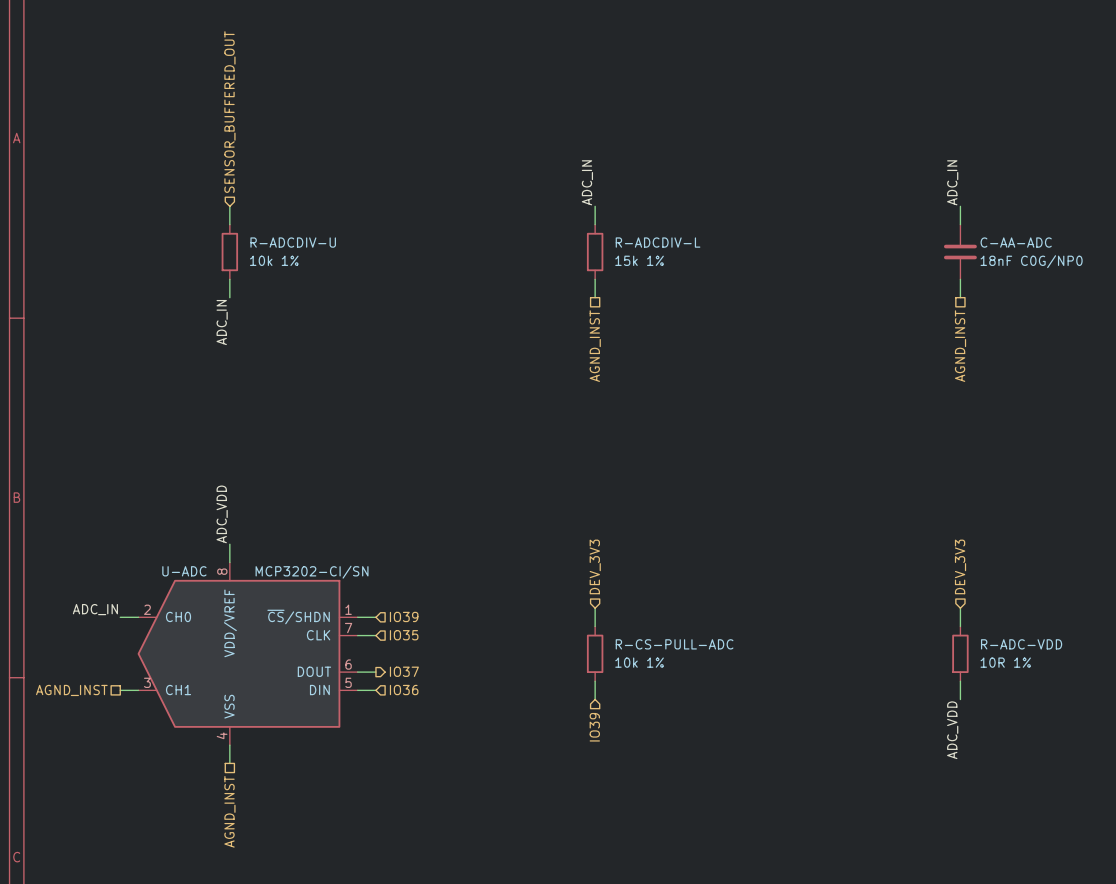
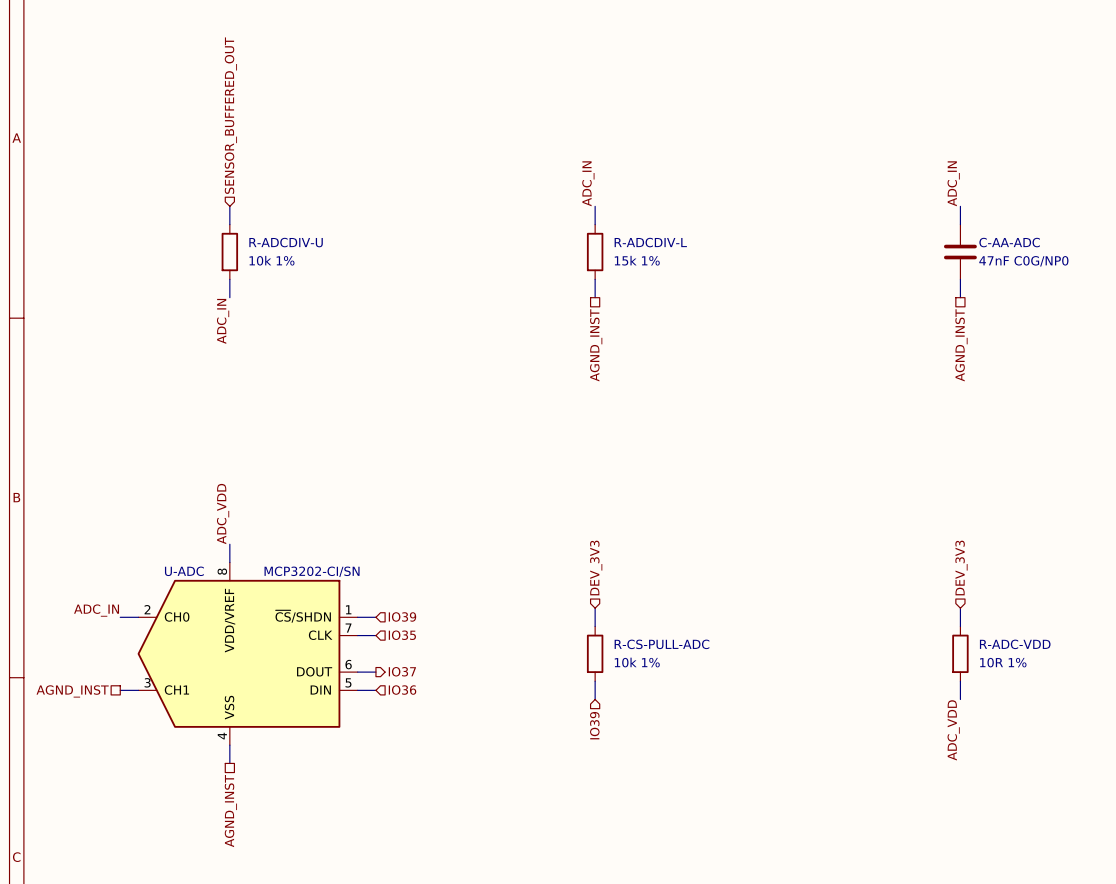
C-AA-ADC value: 18nF C0G/NP0 (1031, 261) -> 47nF C0G/NP0 (1023, 261)

